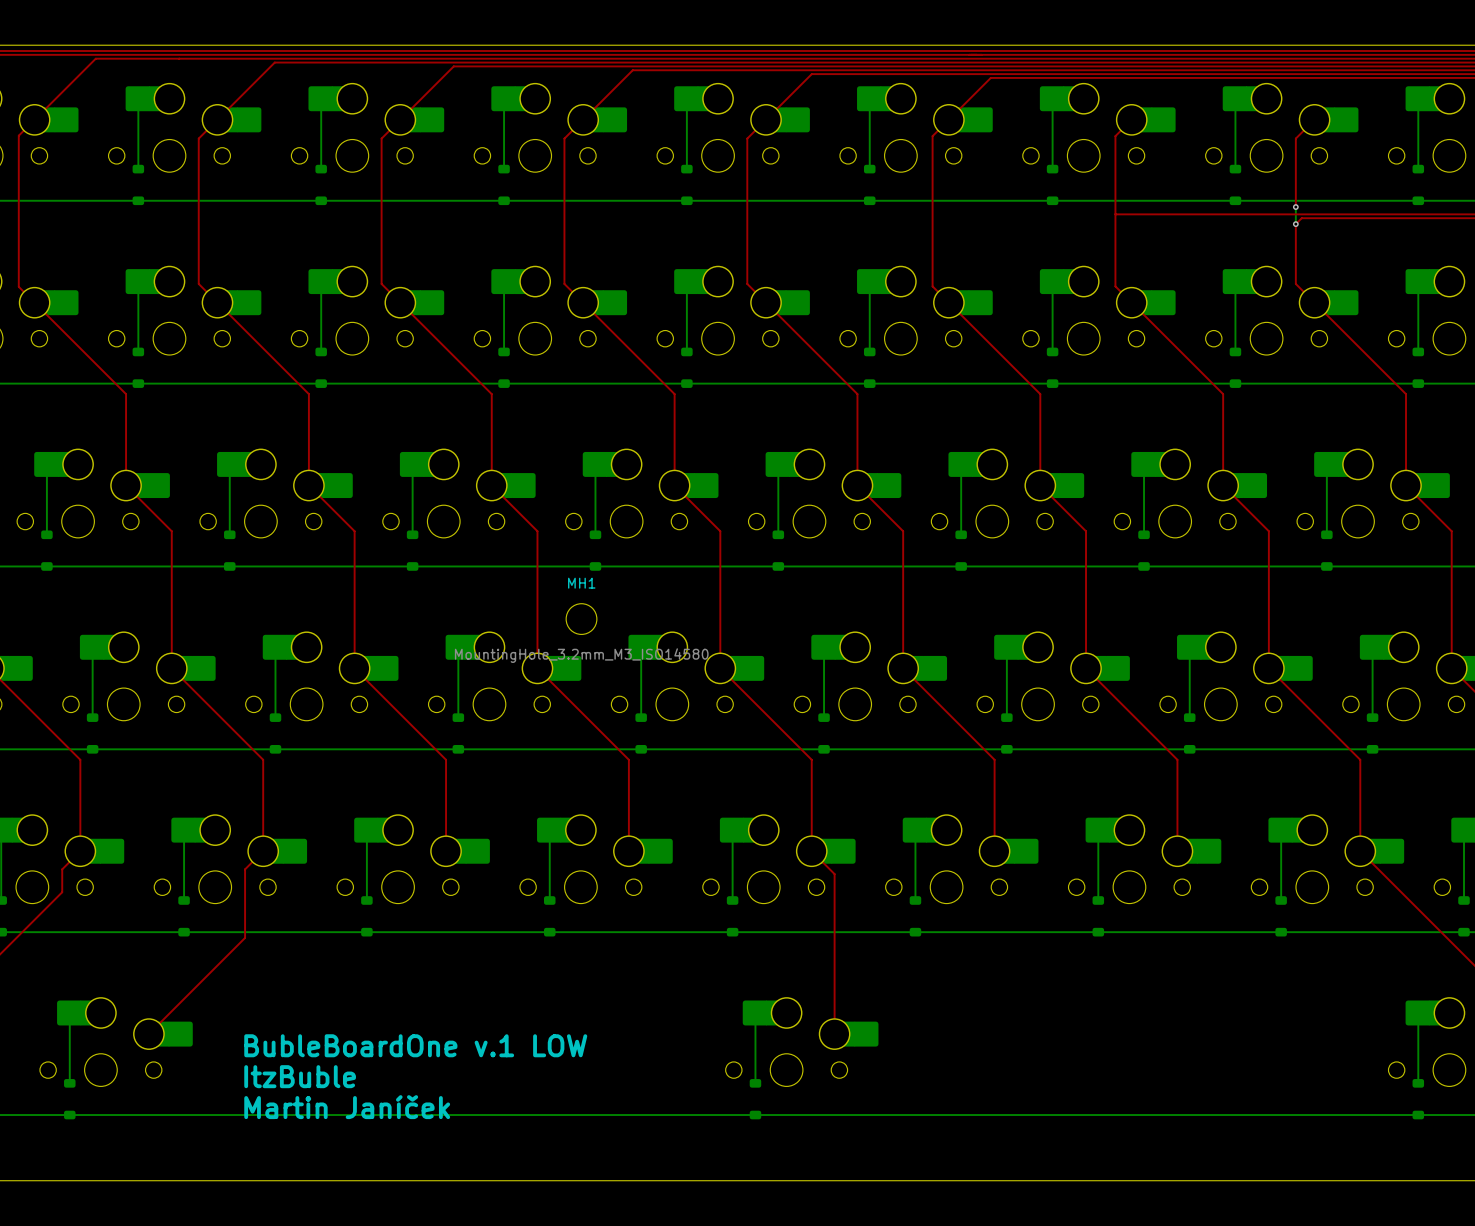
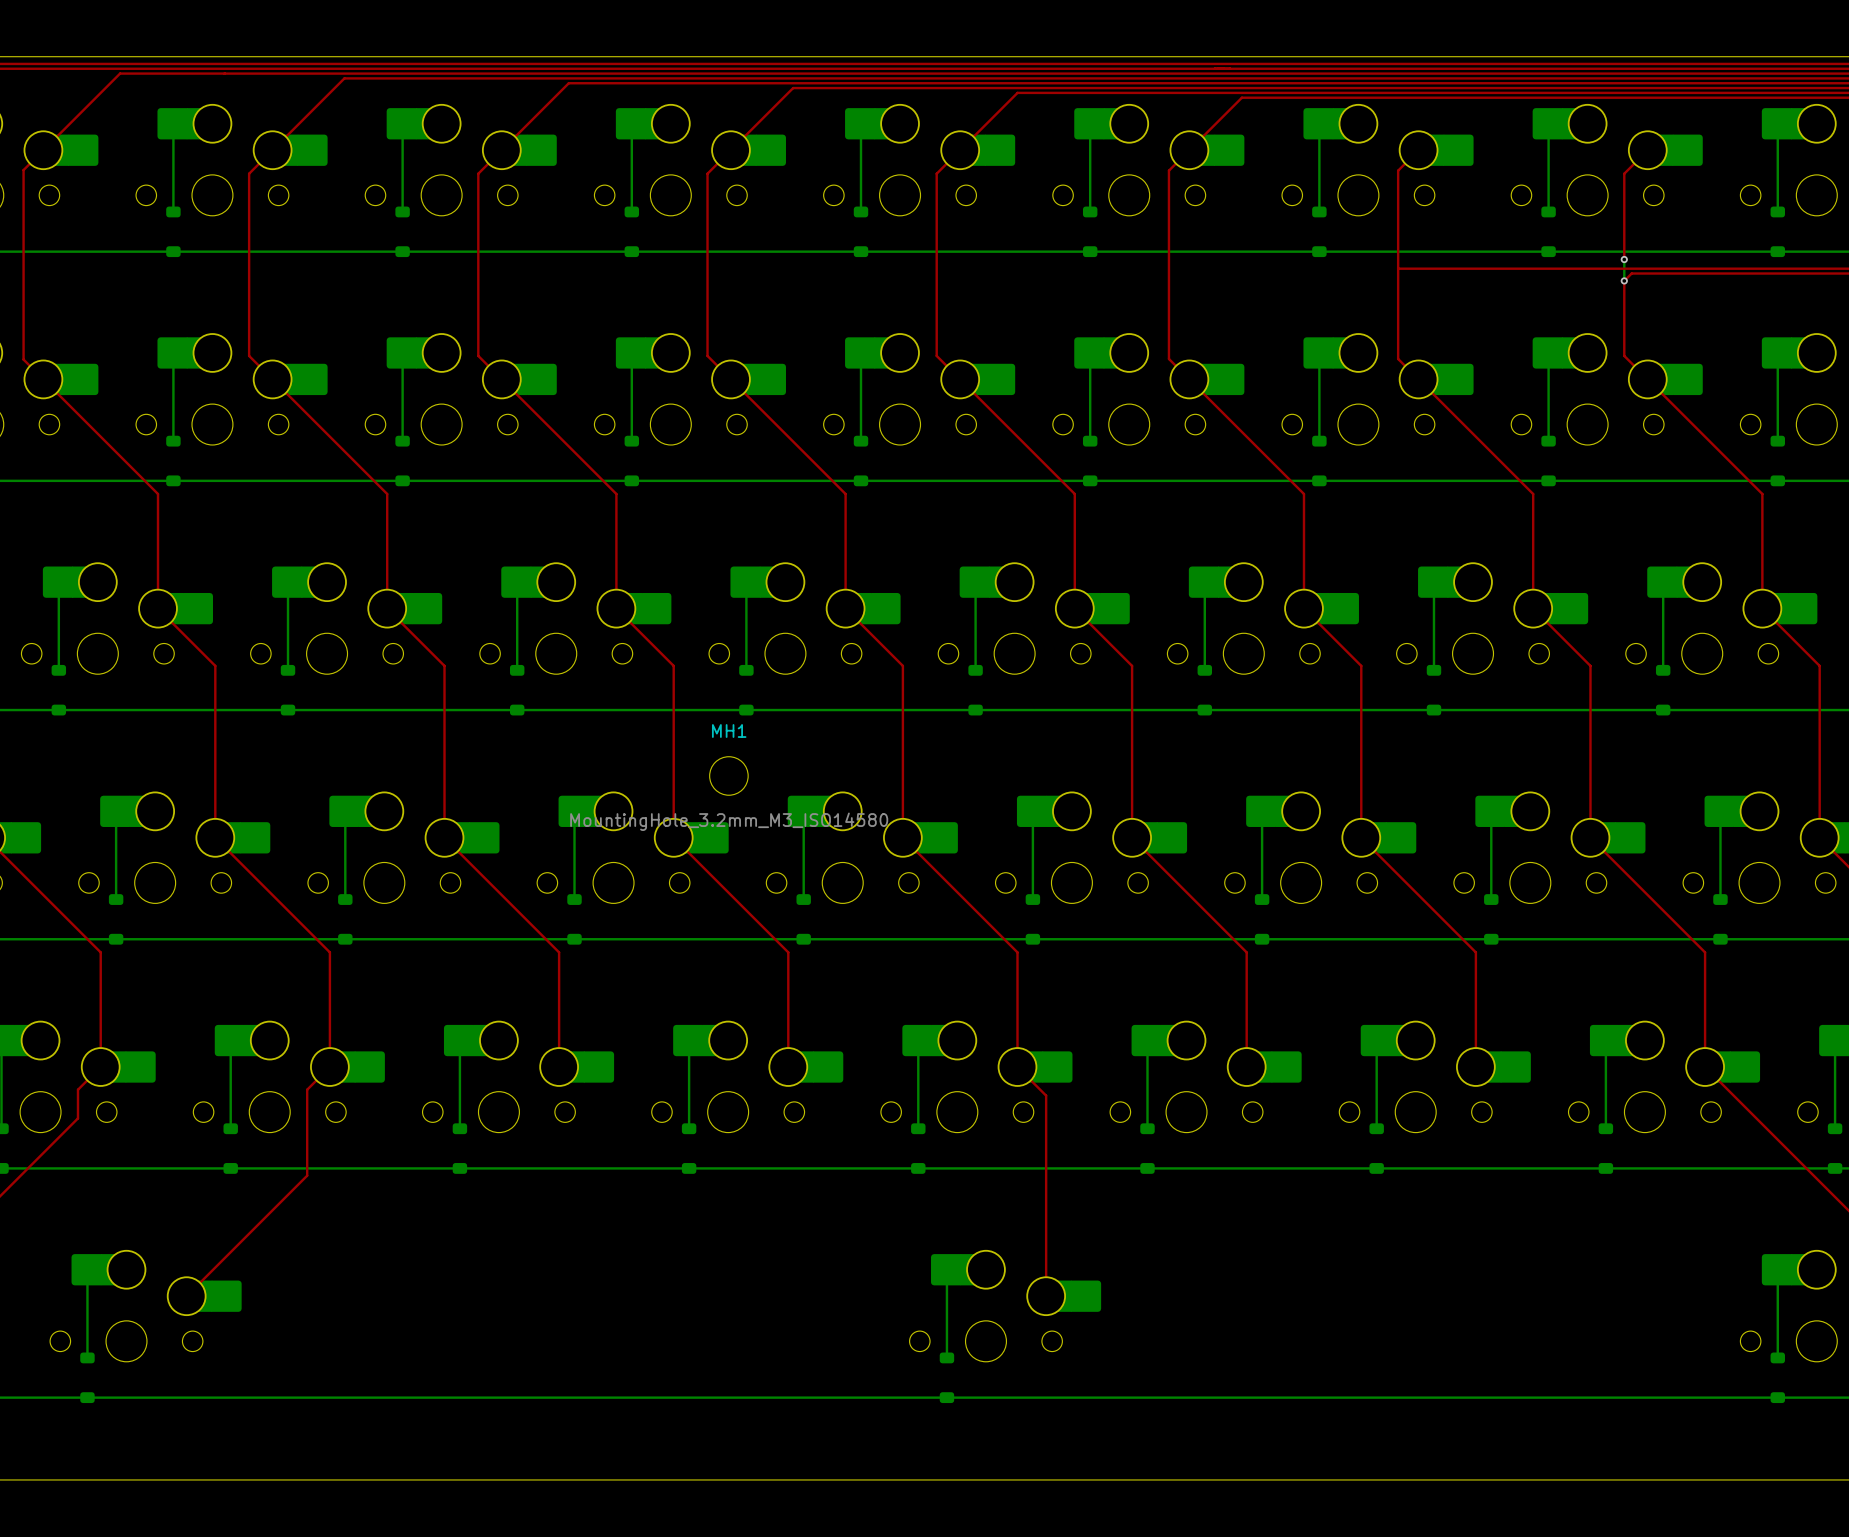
text: BubleBoardOne v.1 LOW (415, 1045) -> none
text: ItzBuble (300, 1076) -> none
text: Martin Janíček (347, 1107) -> none

